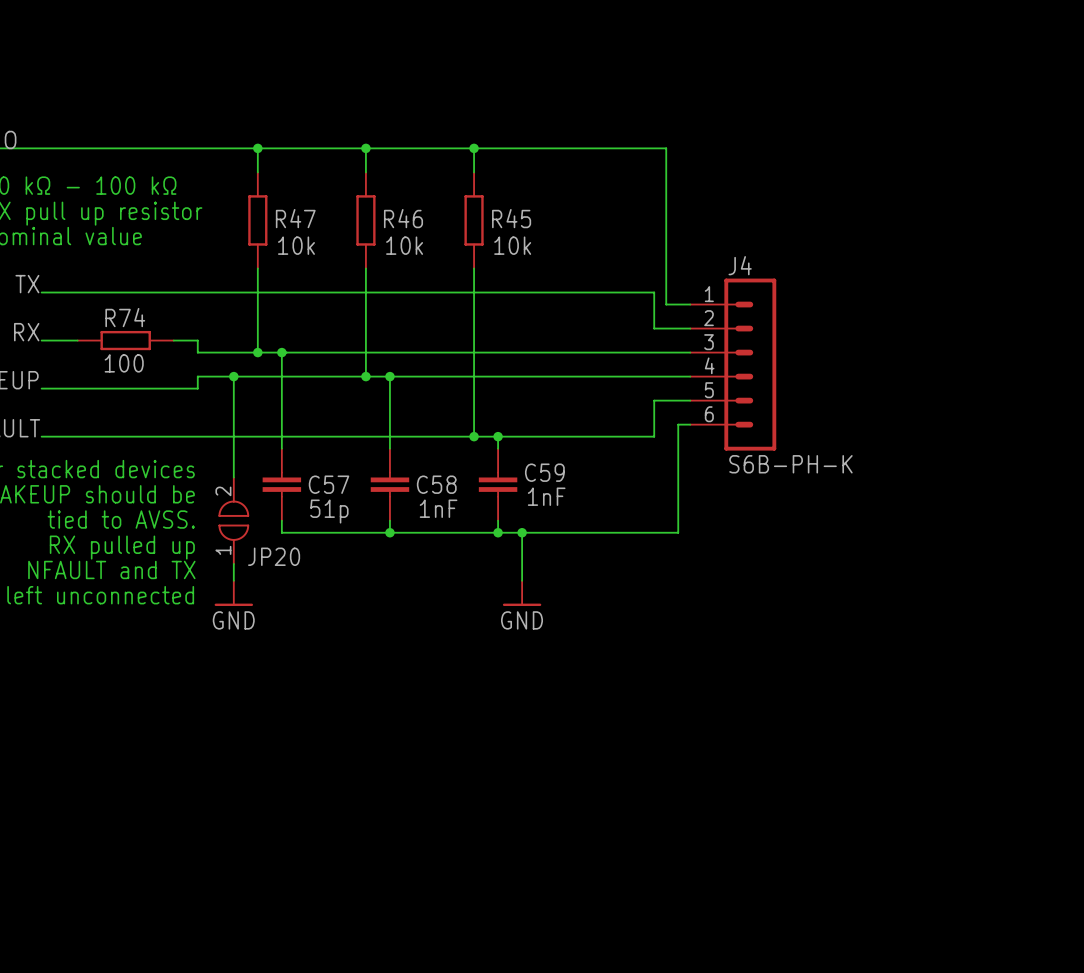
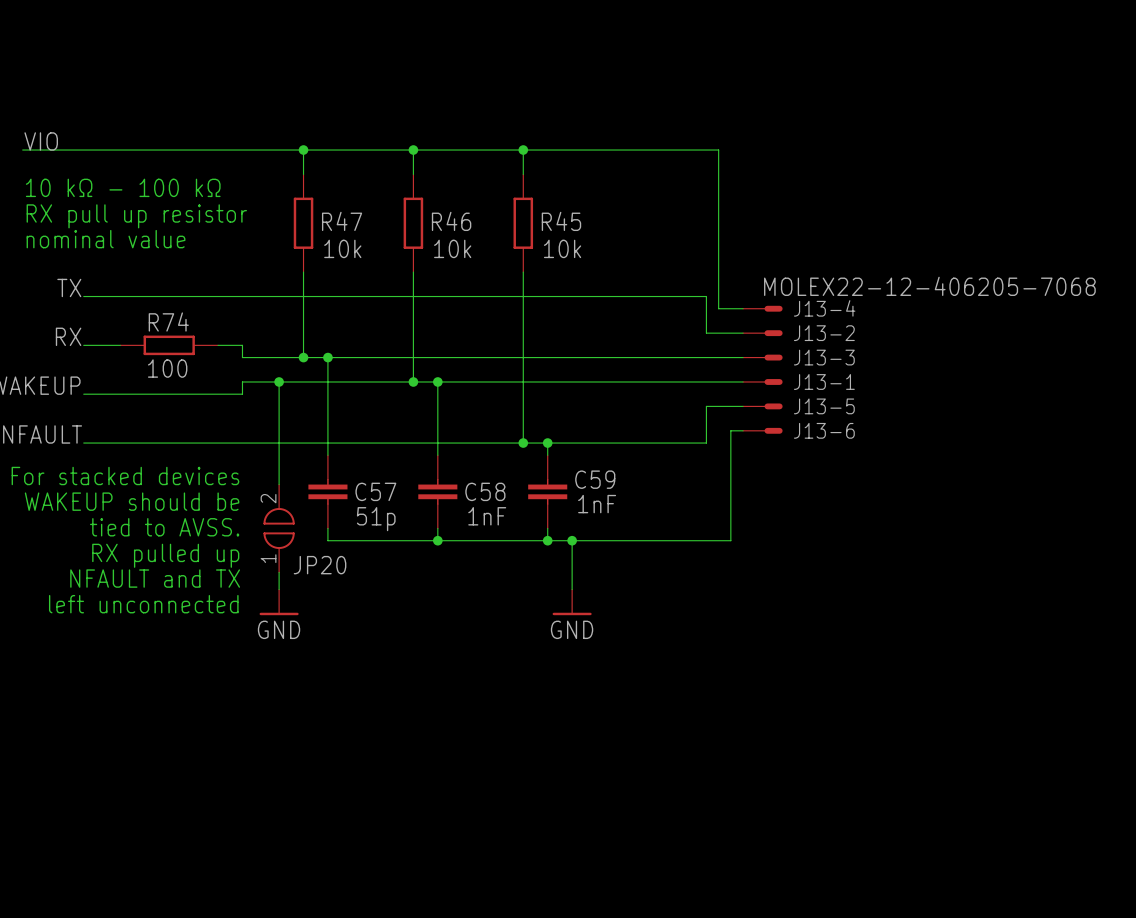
J13-4: none -> (762, 308)
J13-2: none -> (762, 333)
J13-3: none -> (762, 357)
J4: S6B-PH-K (733, 364) -> none
J13-1: none -> MOLEX22-12-406205-7068 (762, 381)
J13-5: none -> (762, 406)
J13-6: none -> (762, 430)

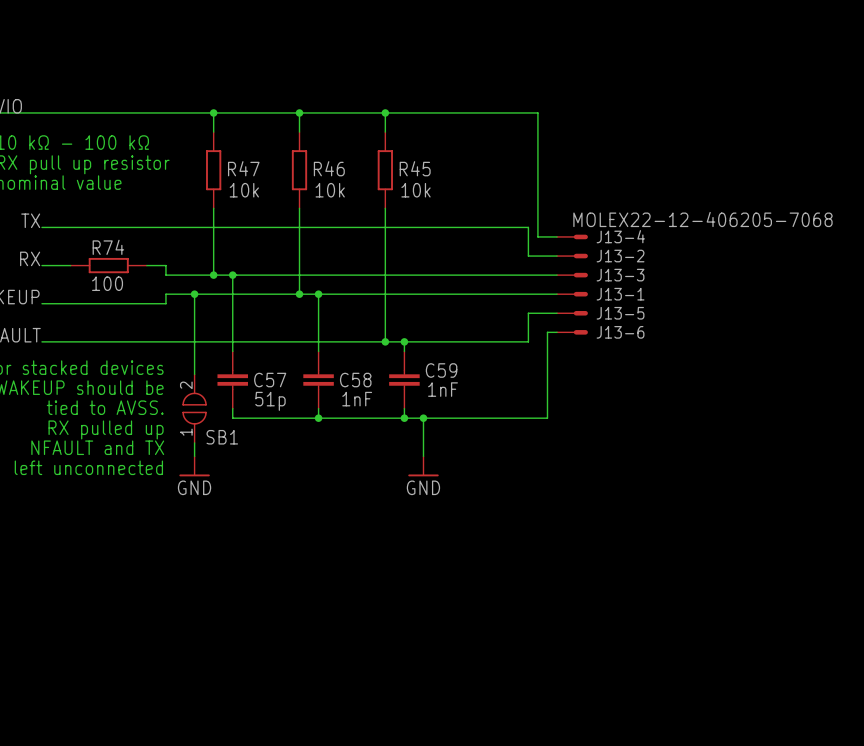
JP20 name: JP20 (320, 565) -> SB1 (222, 437)

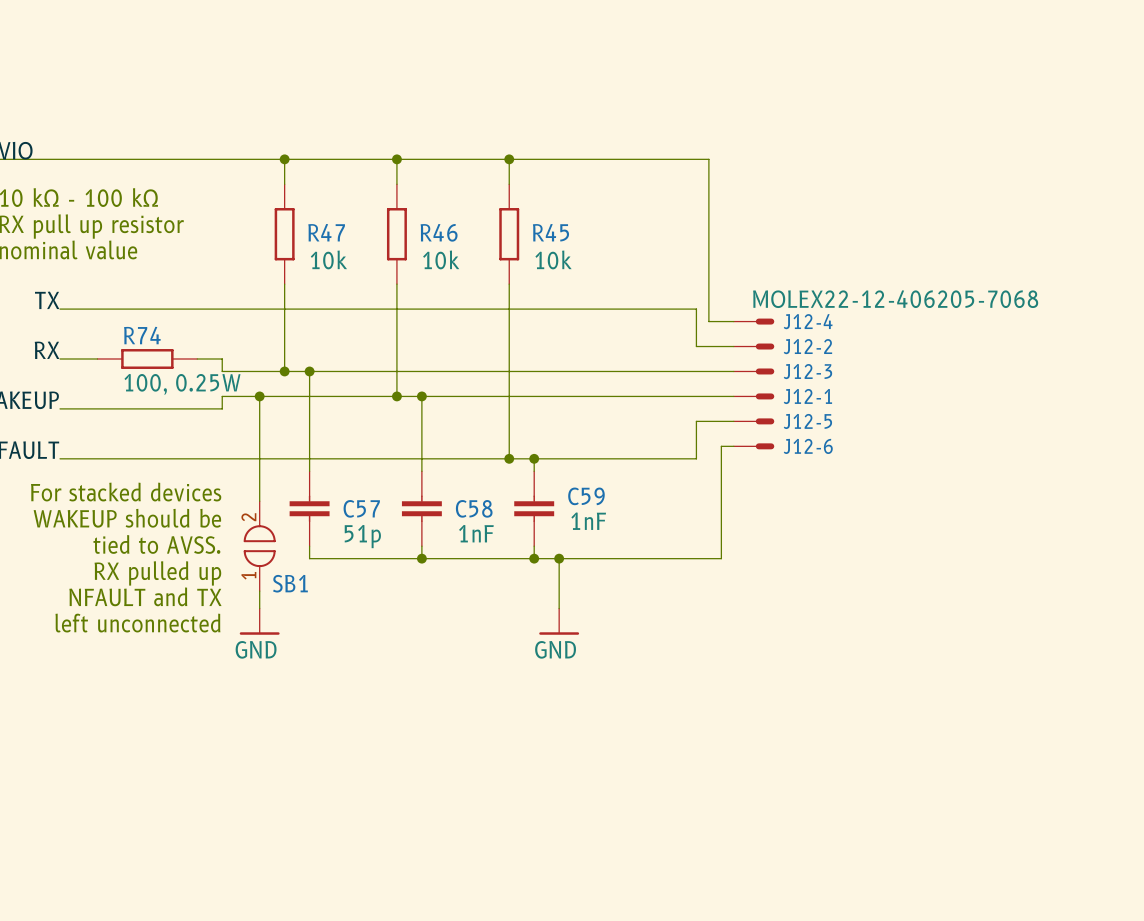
J13-4 name: J13-4 (620, 236) -> J12-4 (808, 321)
J13-2 name: J13-2 (620, 256) -> J12-2 (807, 346)
J13-3 name: J13-3 (620, 275) -> J12-3 (807, 371)
R74 value: 100 (107, 283) -> 100, 0.25W (182, 384)
J13-1 name: J13-1 (620, 294) -> J12-1 (807, 396)
J13-5 name: J13-5 (620, 313) -> J12-5 (807, 421)
J13-6 name: J13-6 (620, 332) -> J12-6 (808, 446)

